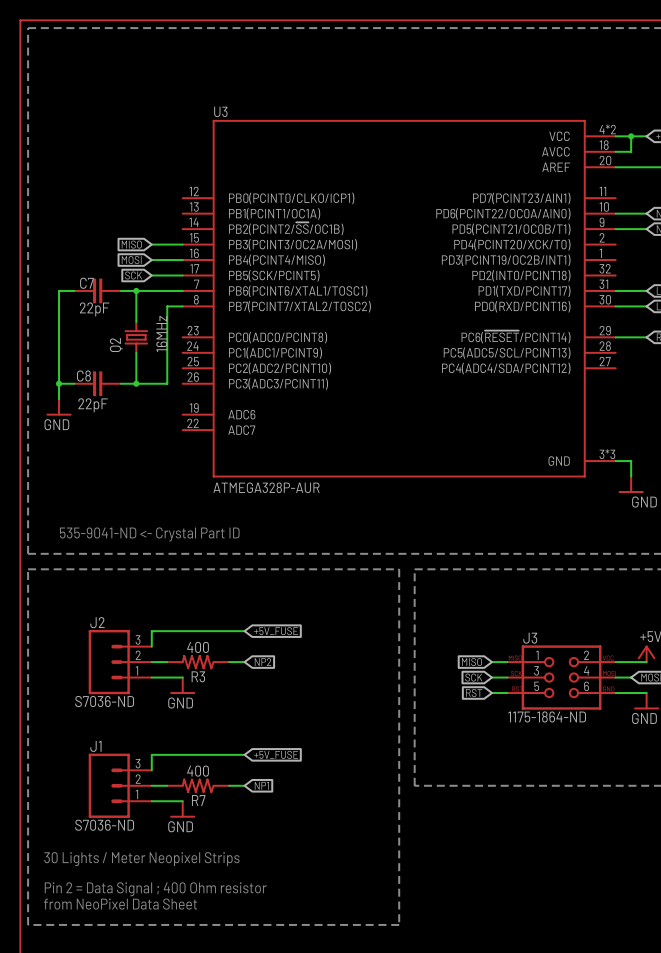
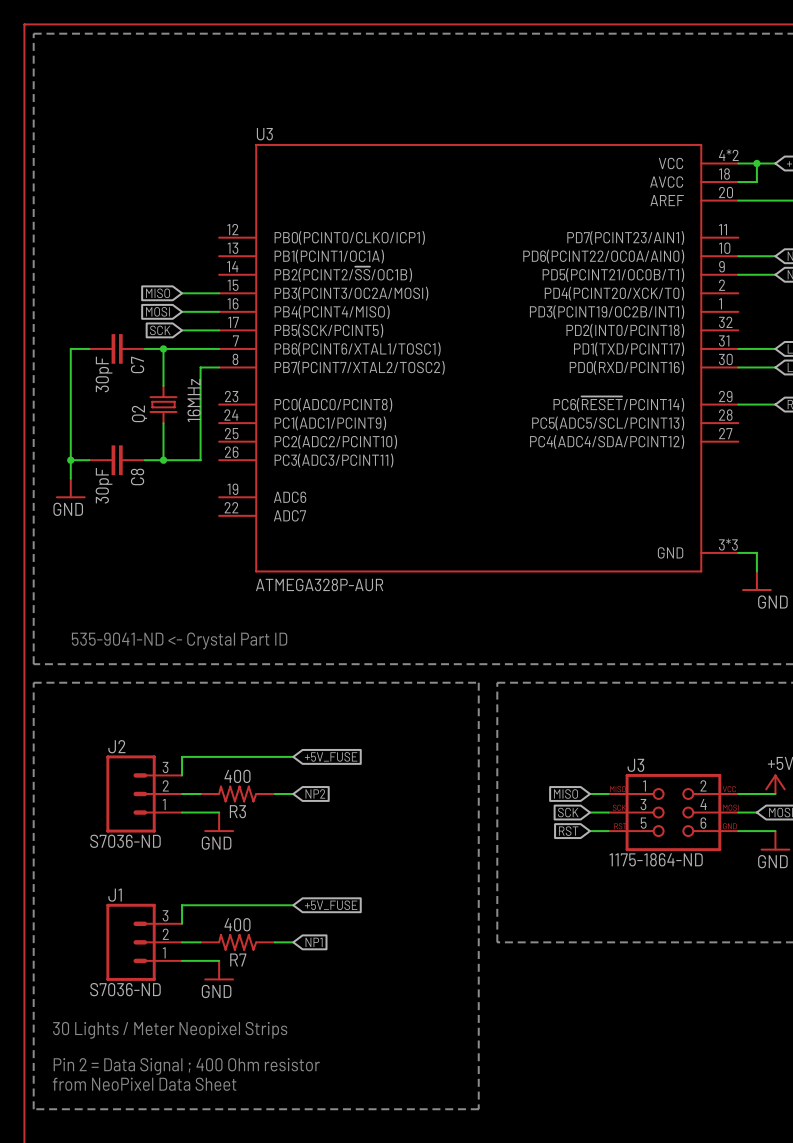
C7 name rotation: 0° (86, 283) -> 90° counterclockwise (137, 364)
C7 name position: C7 (86, 283) -> C7 (137, 364)
C7 value: 22pF (94, 309) -> 30pF (104, 374)
C8 name rotation: 0° (83, 376) -> 90° counterclockwise (137, 476)
C8 name position: C8 (83, 376) -> C8 (137, 476)
C8 value: 22pF (93, 405) -> 30pF (104, 485)

